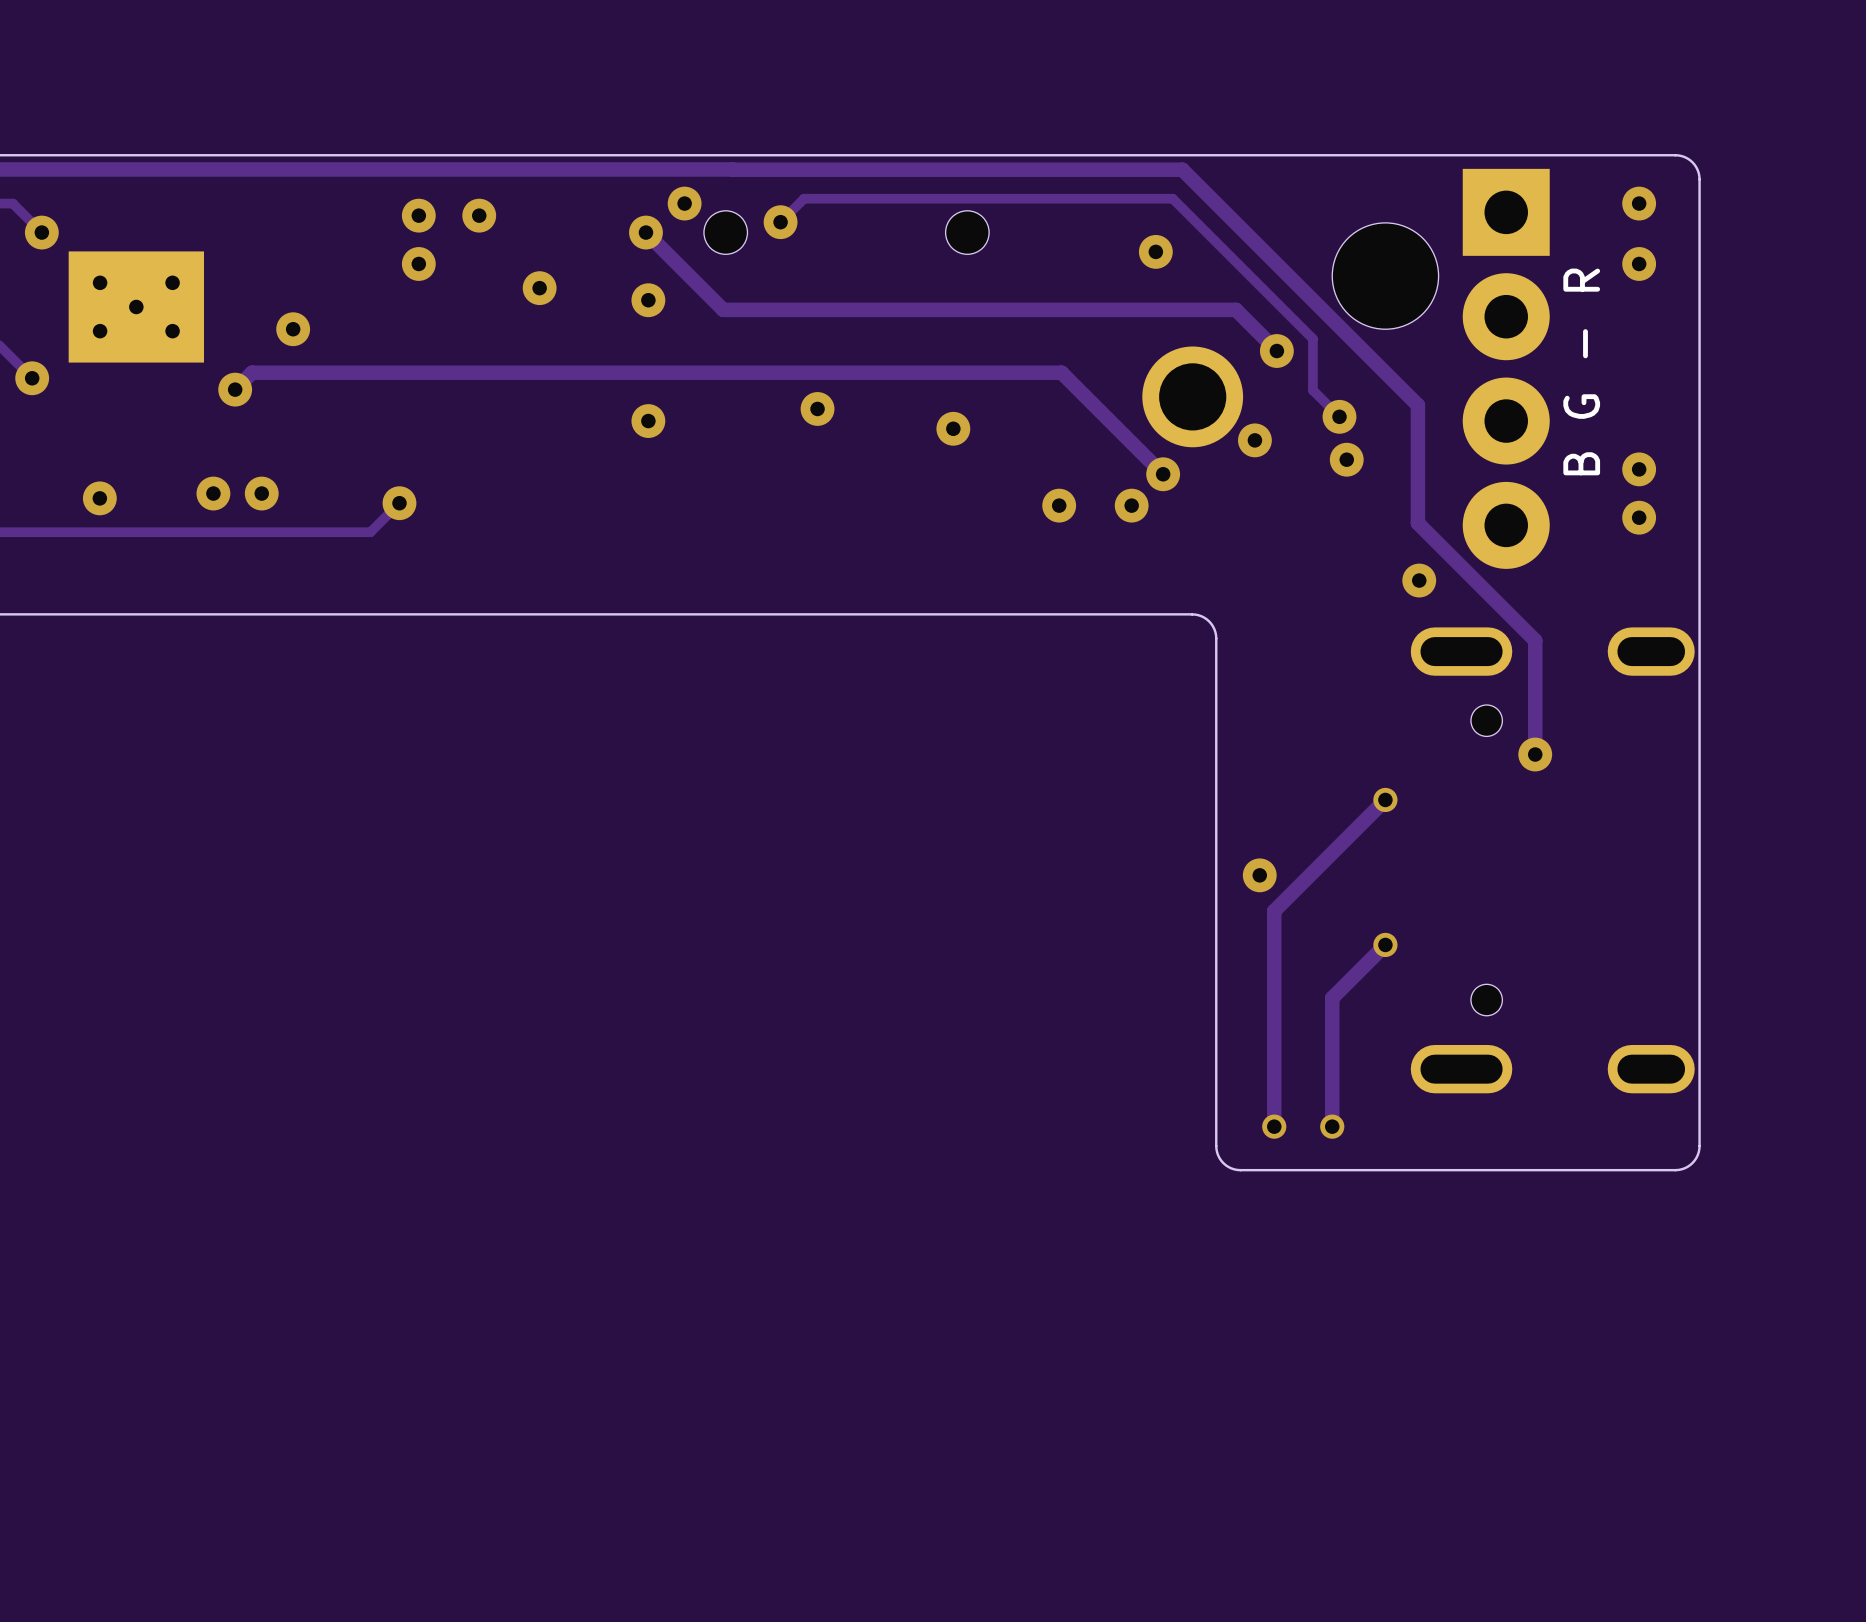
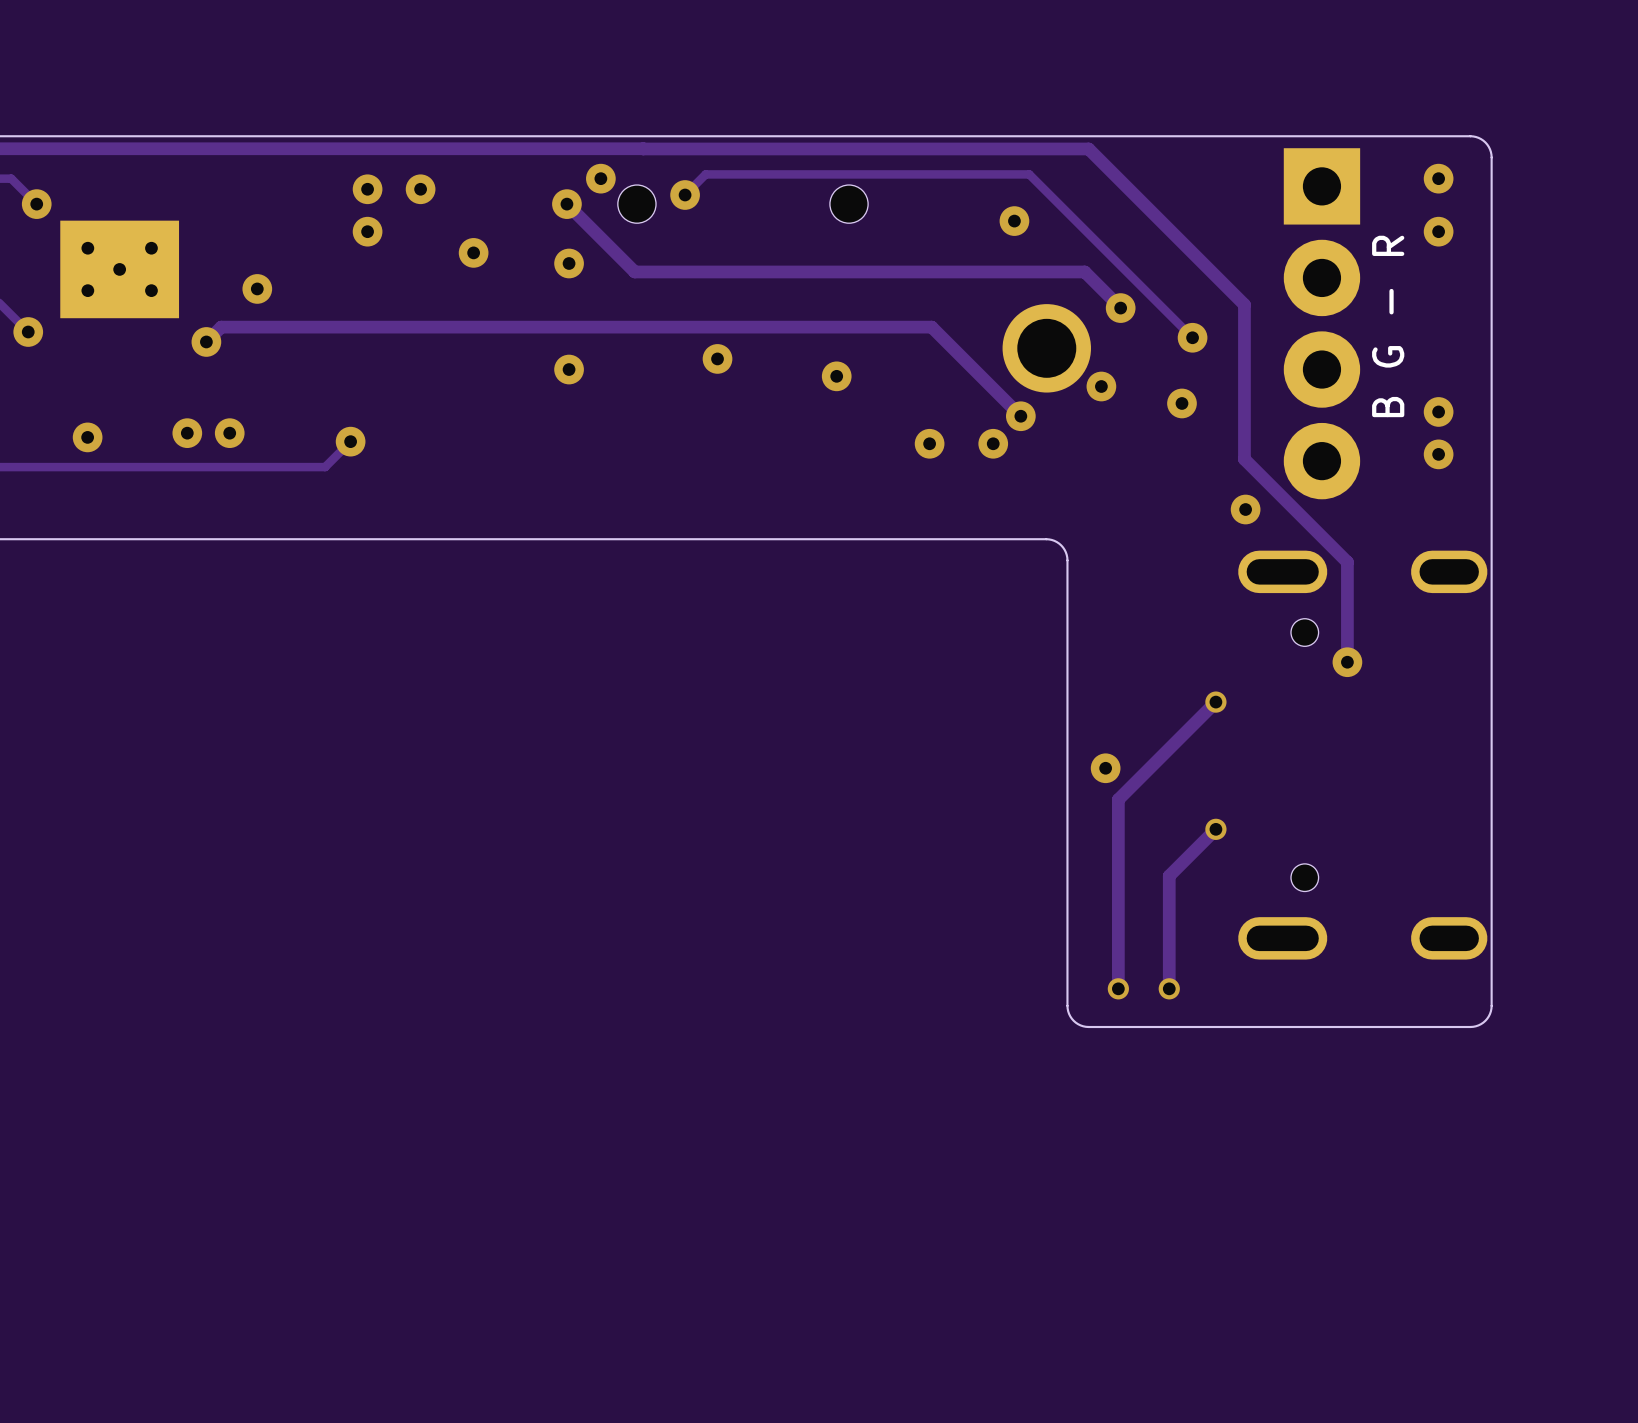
track: (1182, 169) (1417, 405) -> (1037, 148) (1088, 148) (1244, 304) (1244, 355)
part: (1385, 276) -> none
track: (1312, 338) (1312, 390) (1339, 416) -> (1152, 297) (1192, 337)
via position: (1339, 416) -> (1192, 337)

